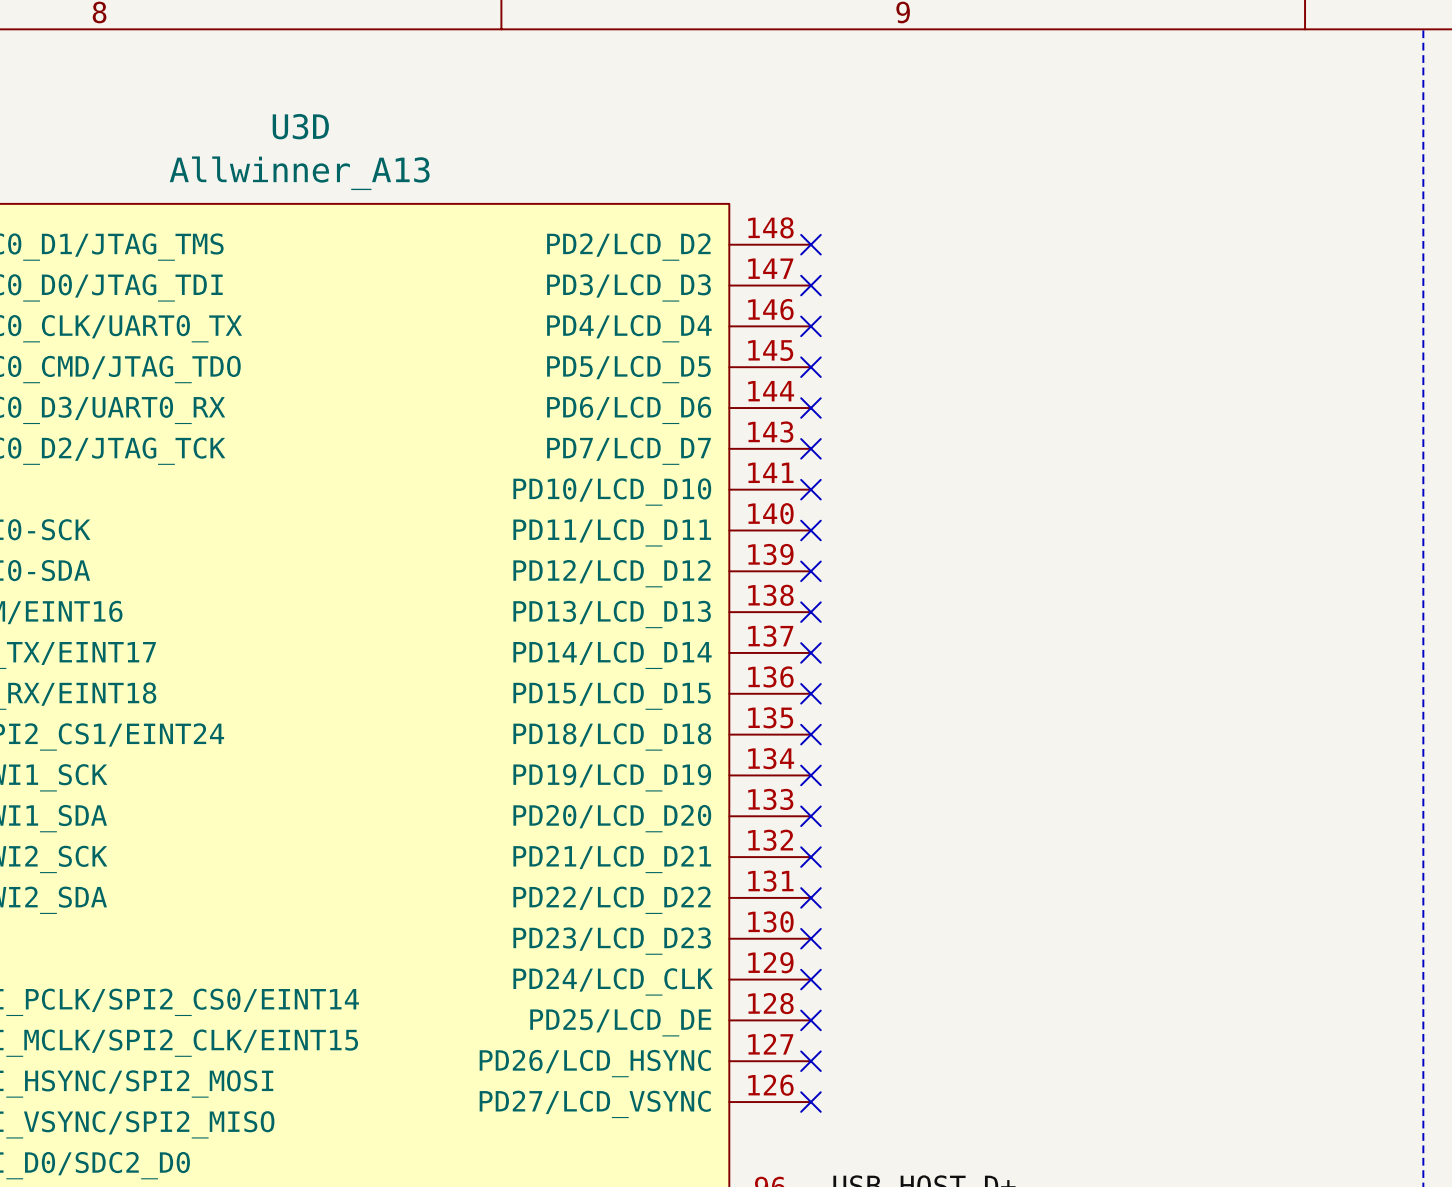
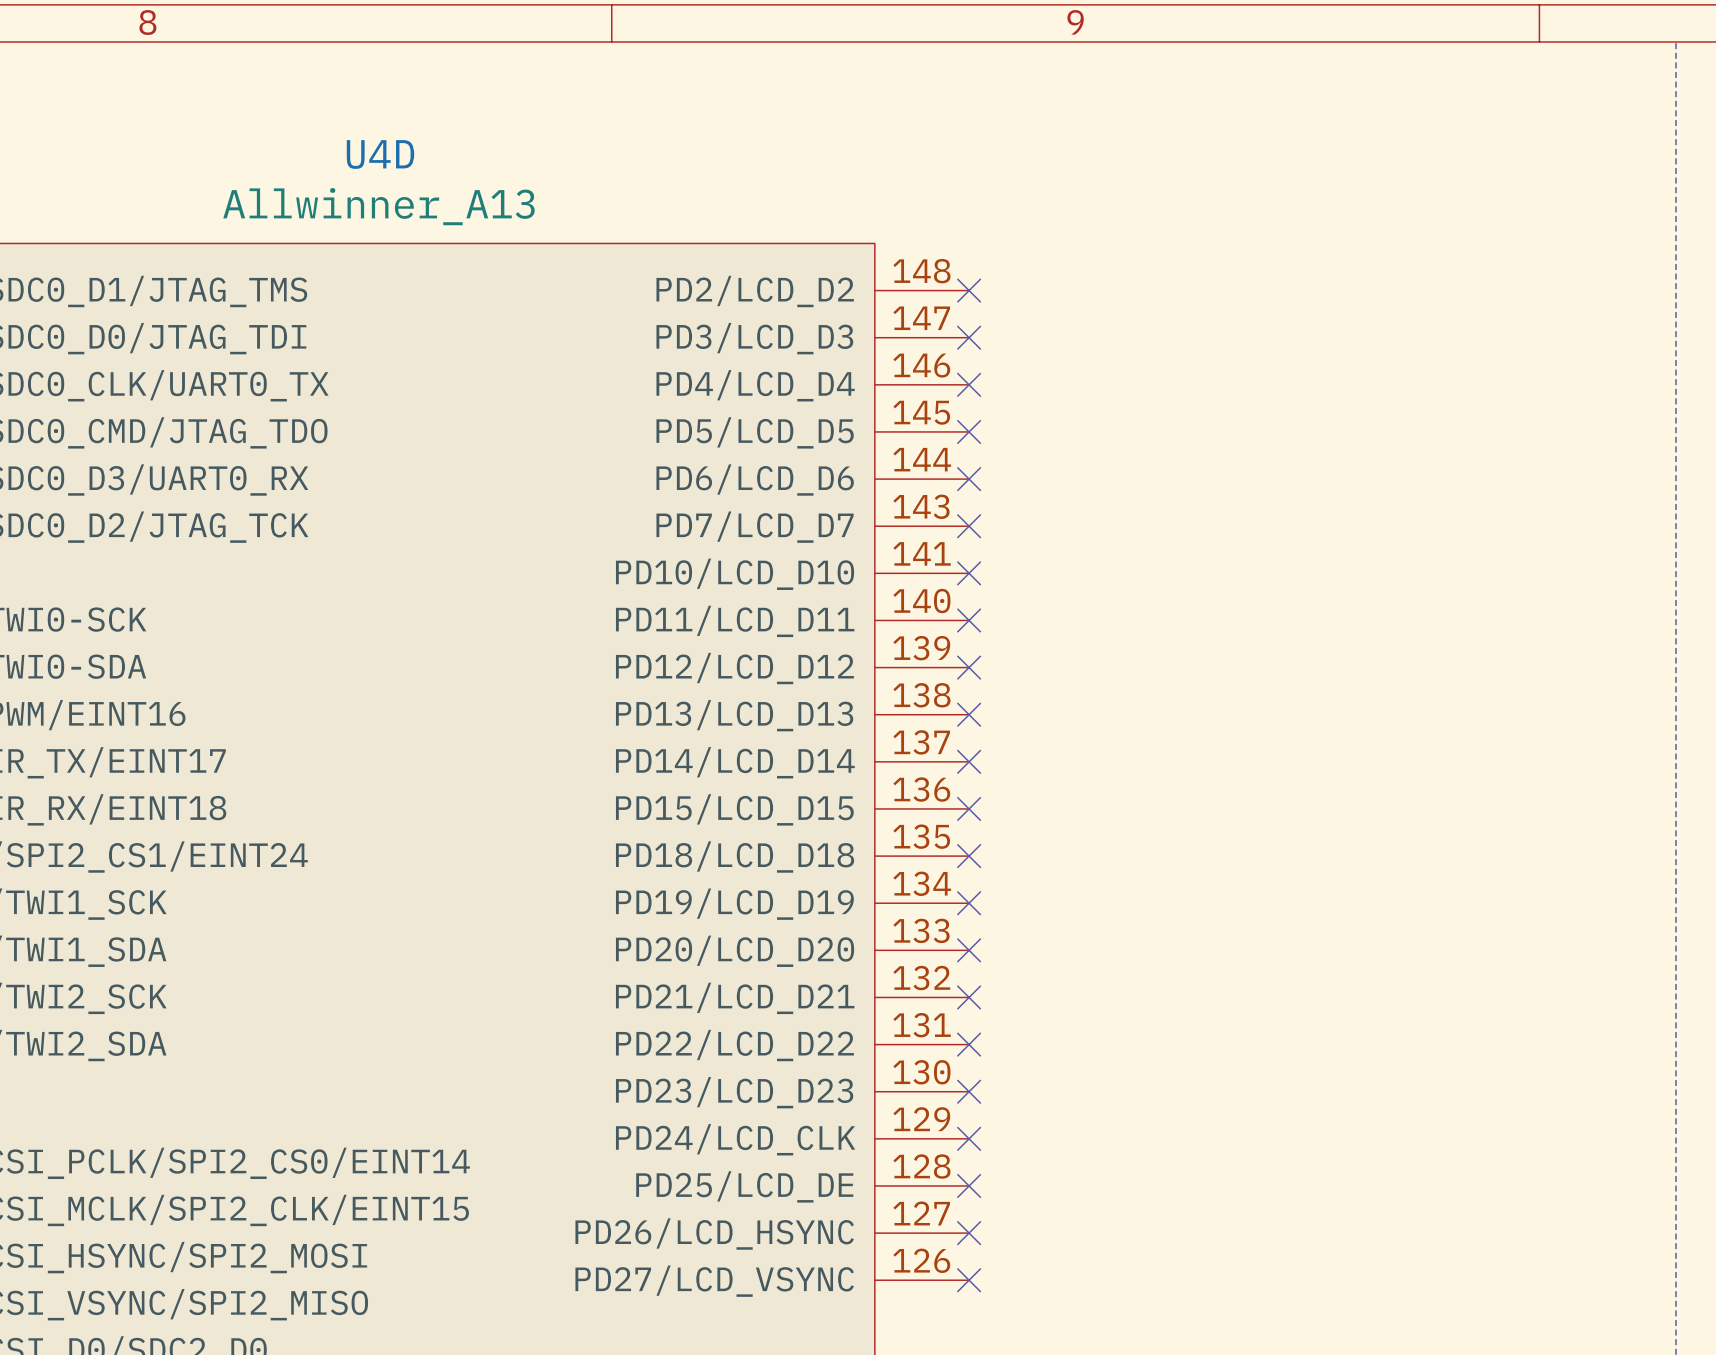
U3D name: U3D (300, 126) -> U4D (380, 154)

